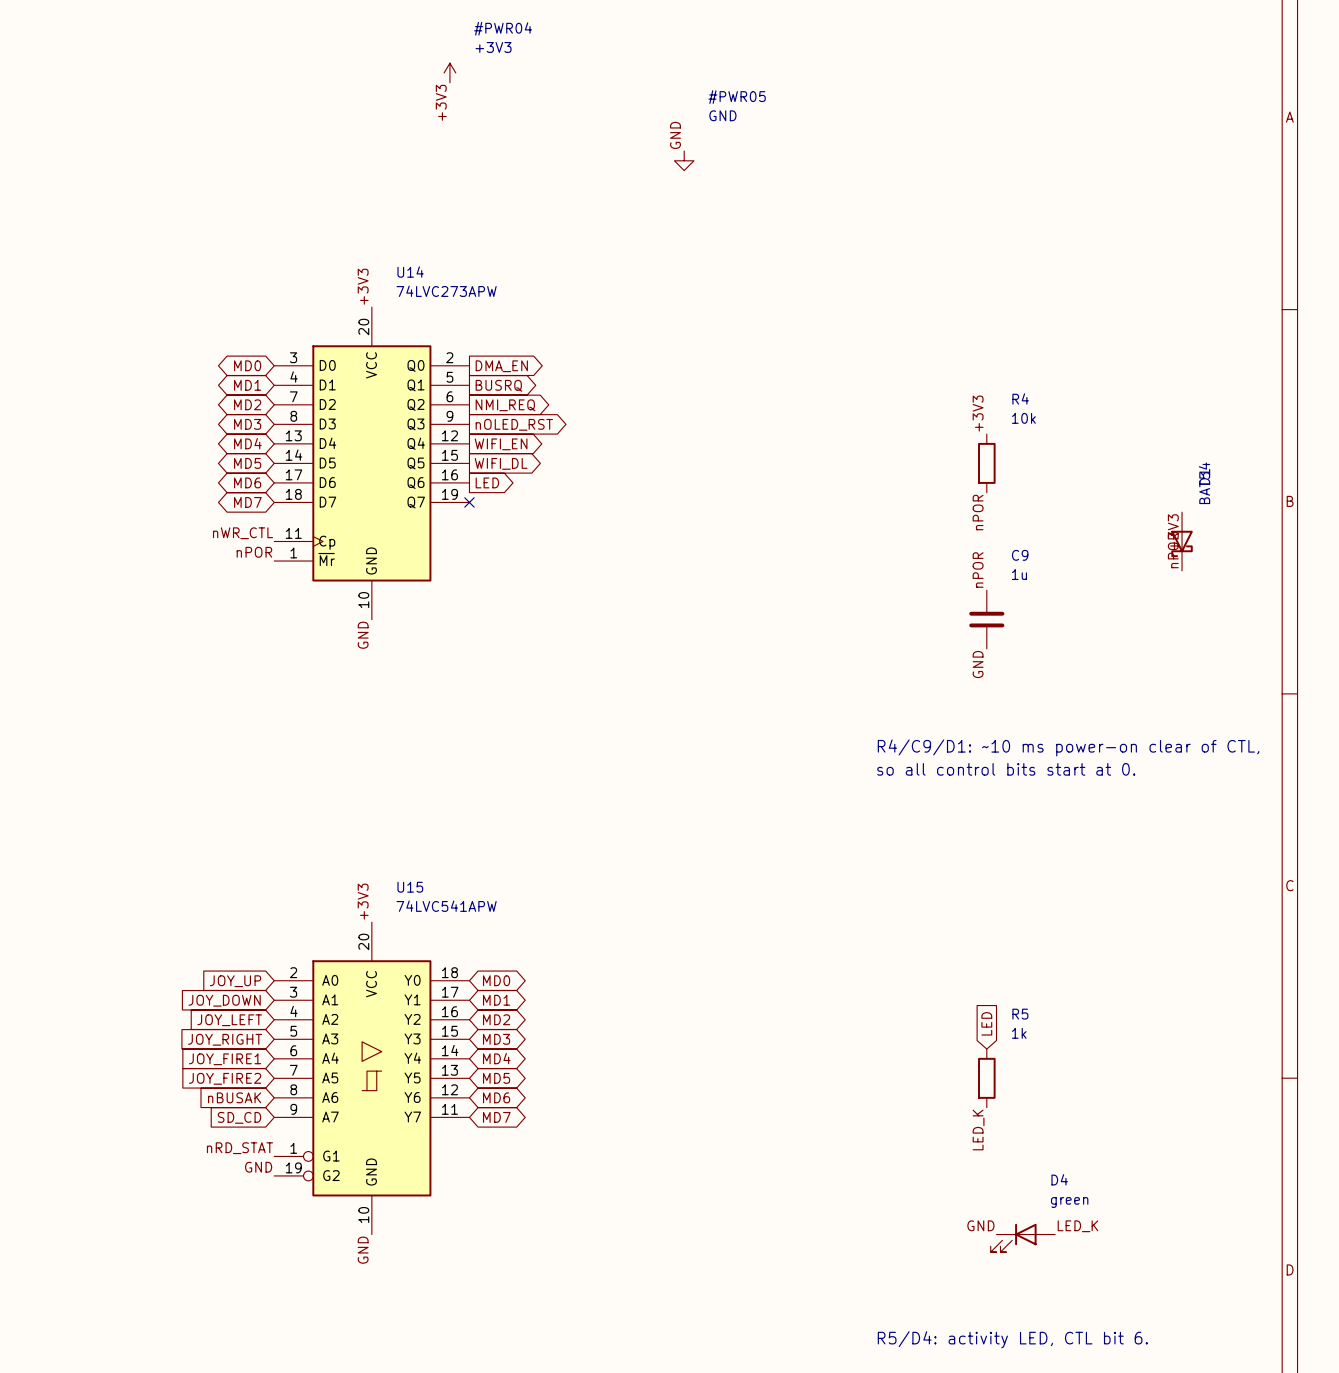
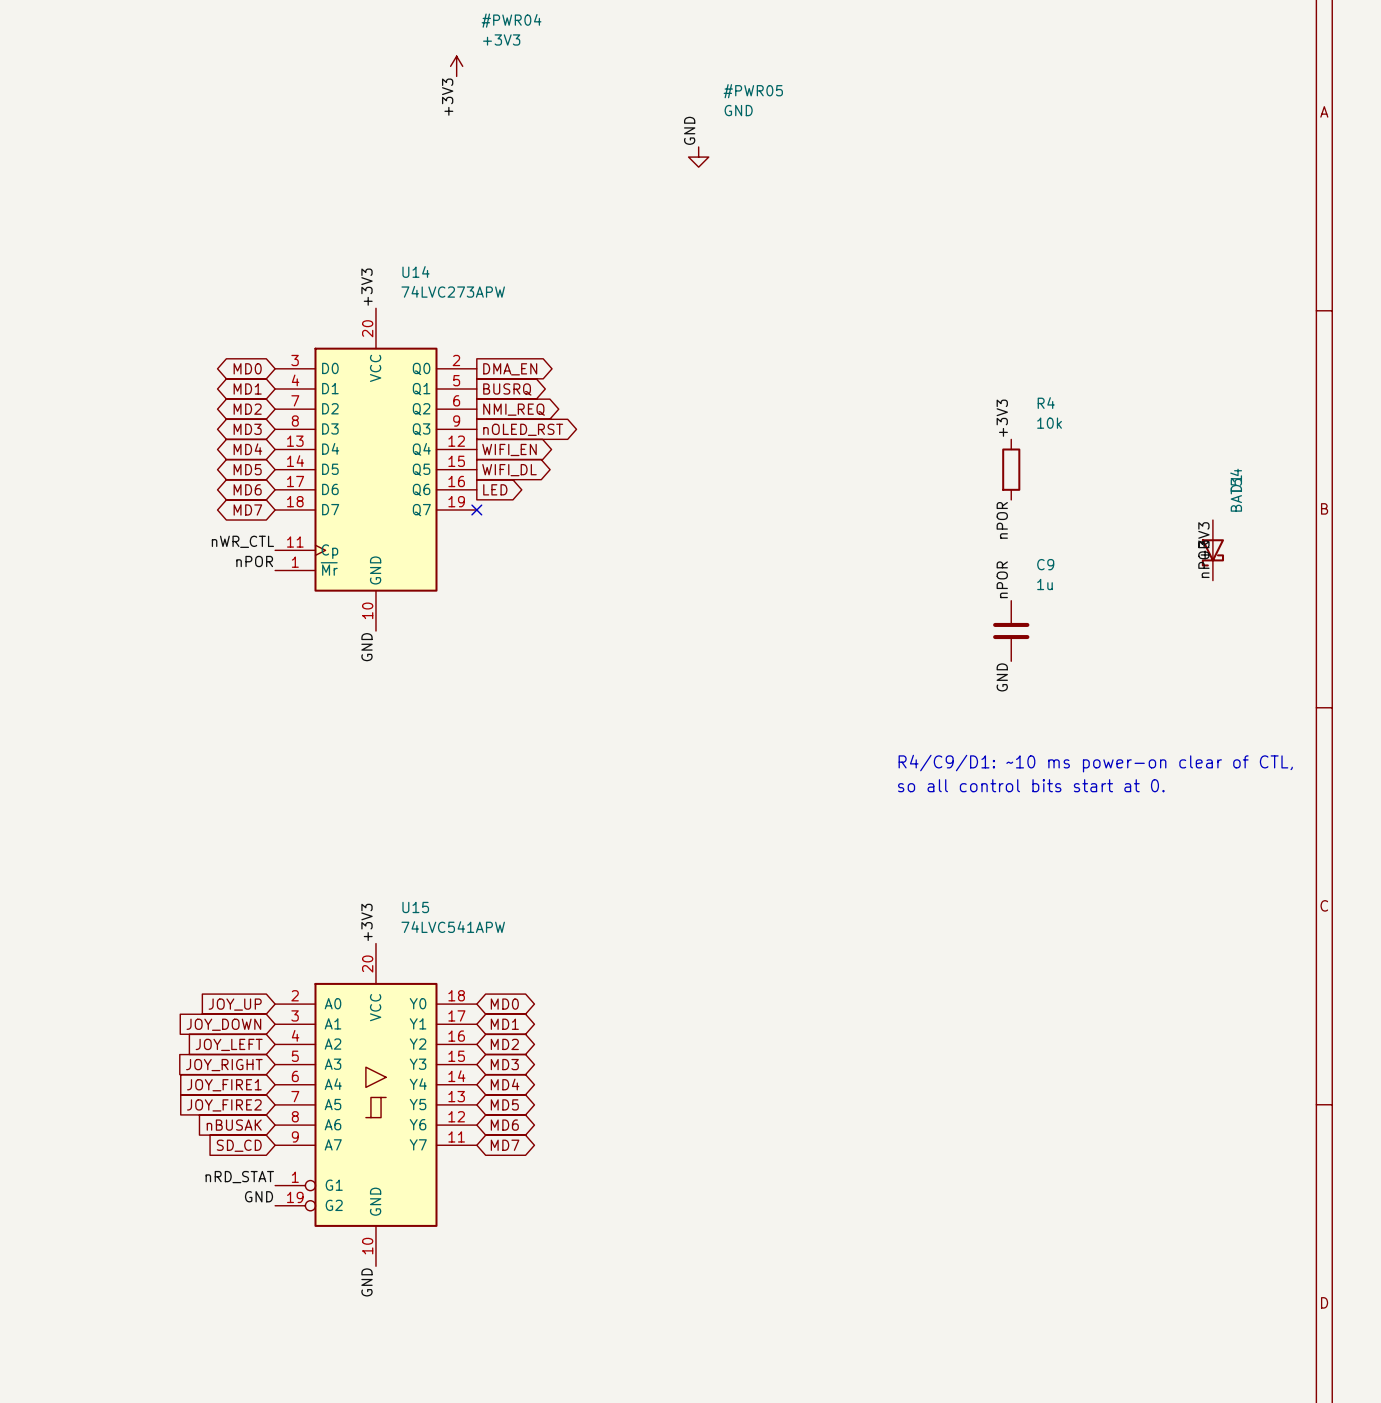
global label: LED (986, 1023) -> none
R5: 1k (986, 1078) -> none
label: LED_K (978, 1130) -> none
label: GND (980, 1225) -> none
label: LED_K (1077, 1226) -> none
D4: green (1022, 1237) -> none
text: R5/D4: activity LED, CTL bit 6. (1012, 1339) -> none

